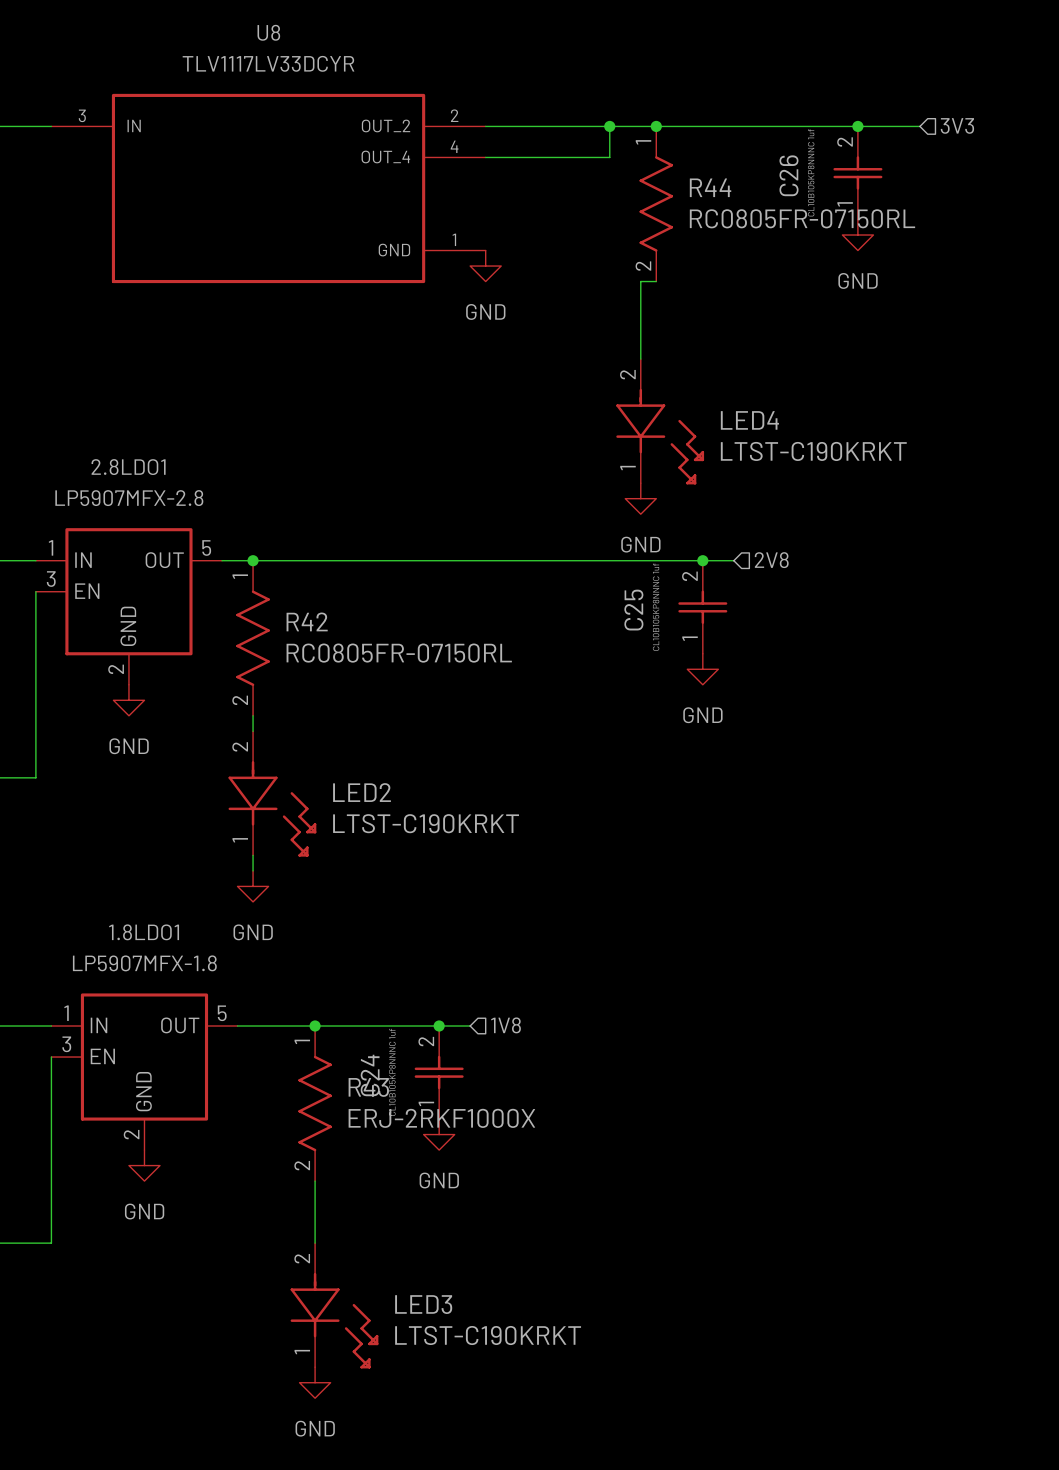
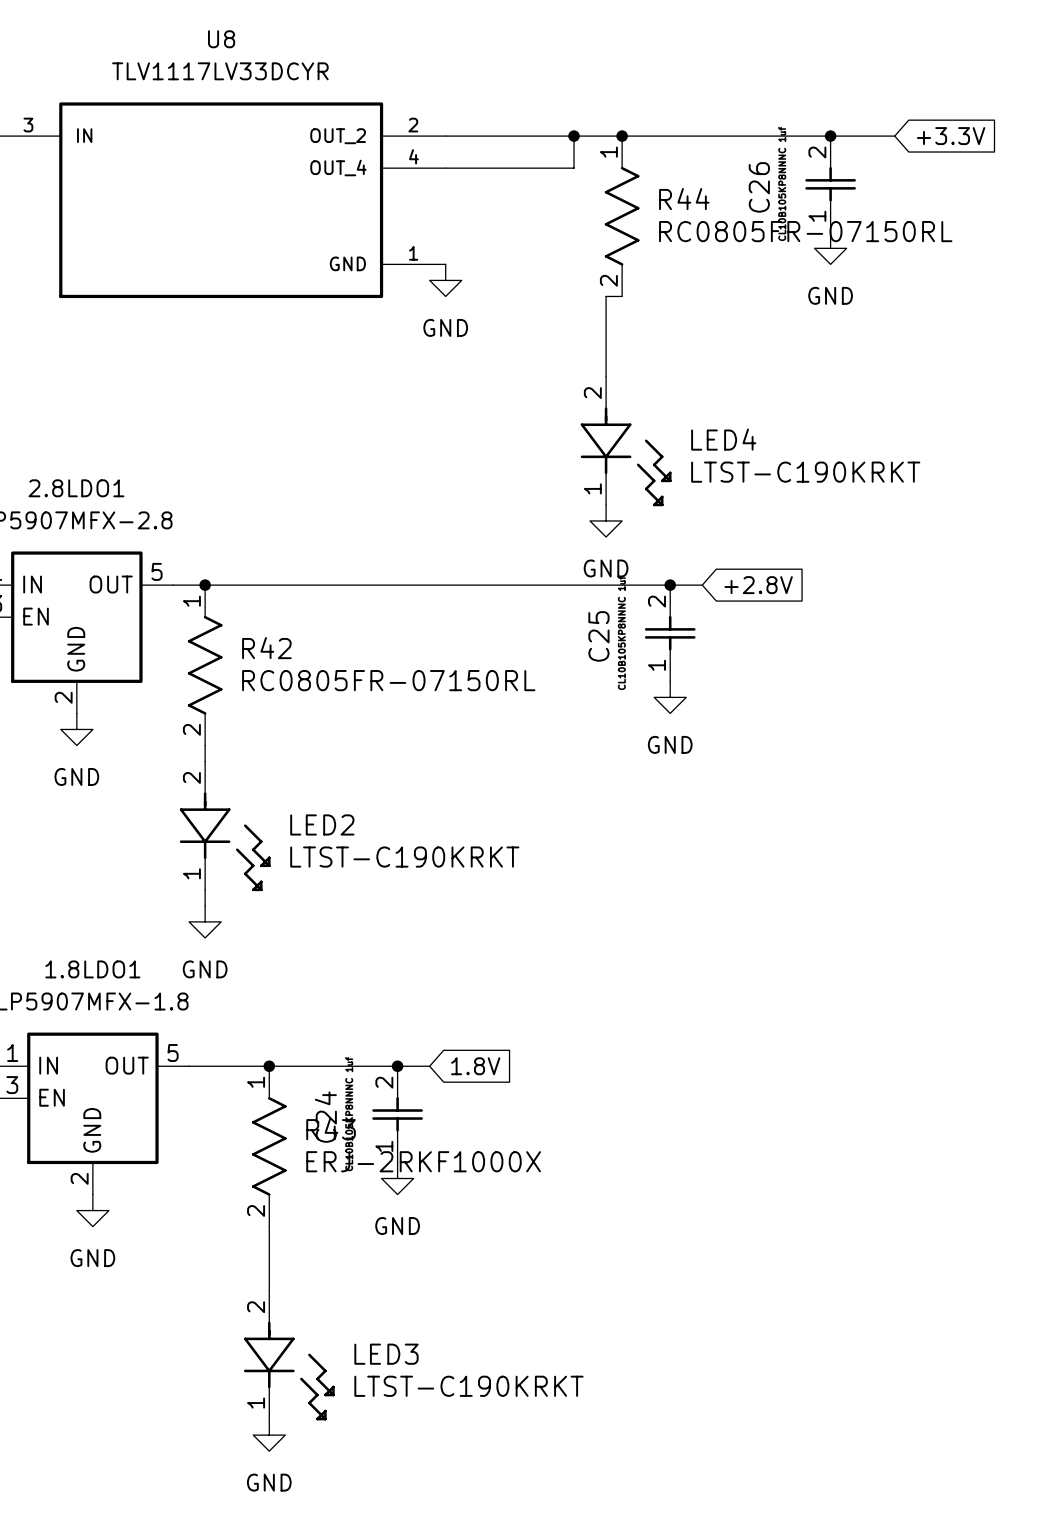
hierarchical label: 3V3 (957, 125) -> none
global label: none -> +3.3V (951, 136)
hierarchical label: 2V8 (771, 560) -> none
global label: none -> +2.8V (758, 585)
hierarchical label: 1V8 (506, 1025) -> none
global label: none -> 1.8V (475, 1066)

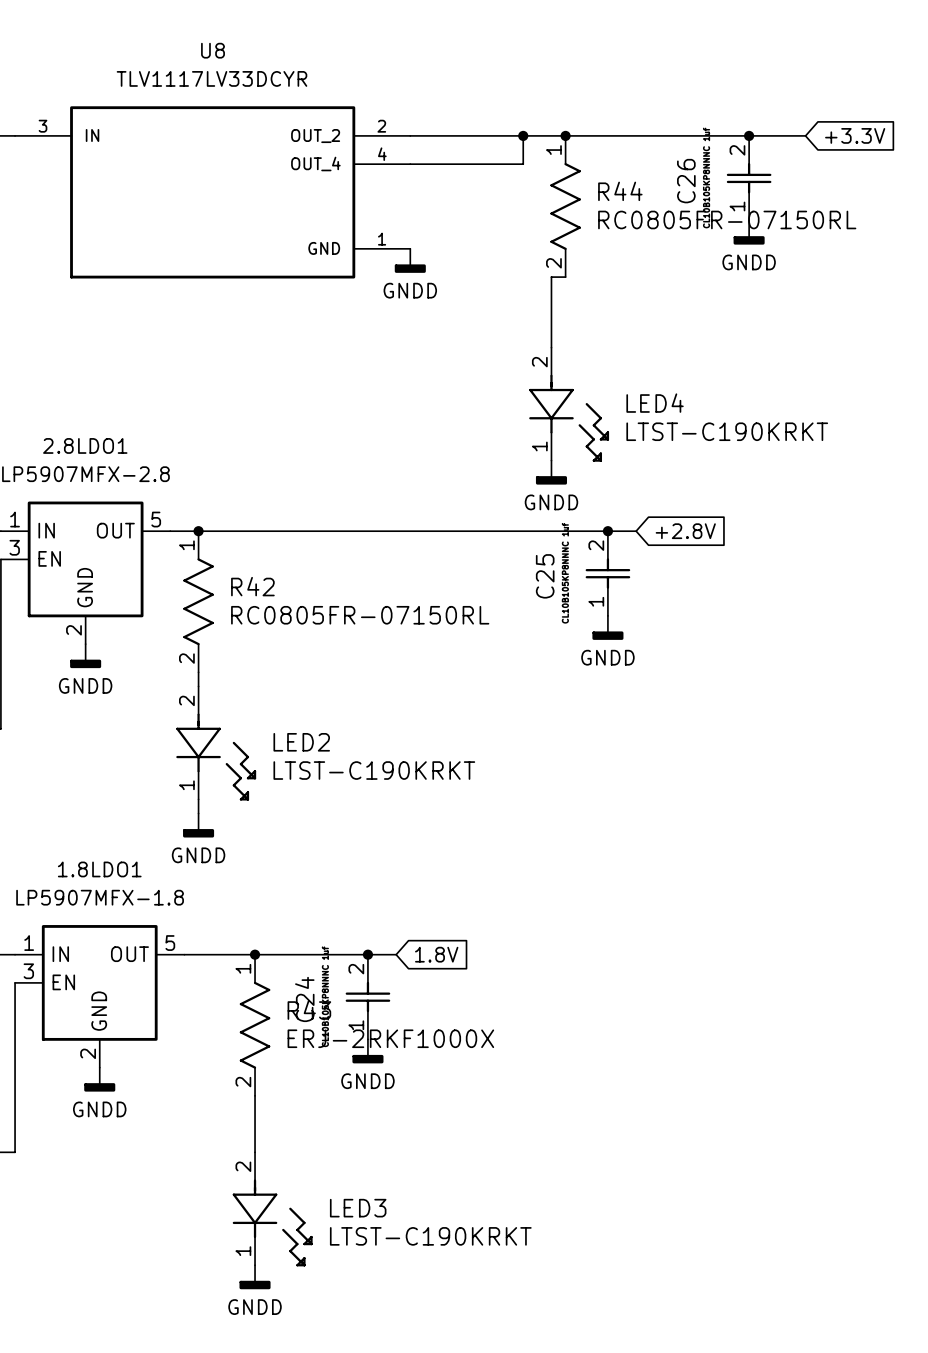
power symbol: GND (830, 248) -> GNDD (749, 232)
power symbol: GND (445, 280) -> GNDD (410, 260)
power symbol: GND (606, 520) -> GNDD (551, 472)
power symbol: GND (670, 697) -> GNDD (607, 627)
power symbol: GND (76, 729) -> GNDD (85, 656)
power symbol: GND (205, 921) -> GNDD (198, 825)
power symbol: GND (397, 1178) -> GNDD (367, 1051)
power symbol: GND (92, 1210) -> GNDD (99, 1079)
power symbol: GND (269, 1435) -> GNDD (255, 1277)

